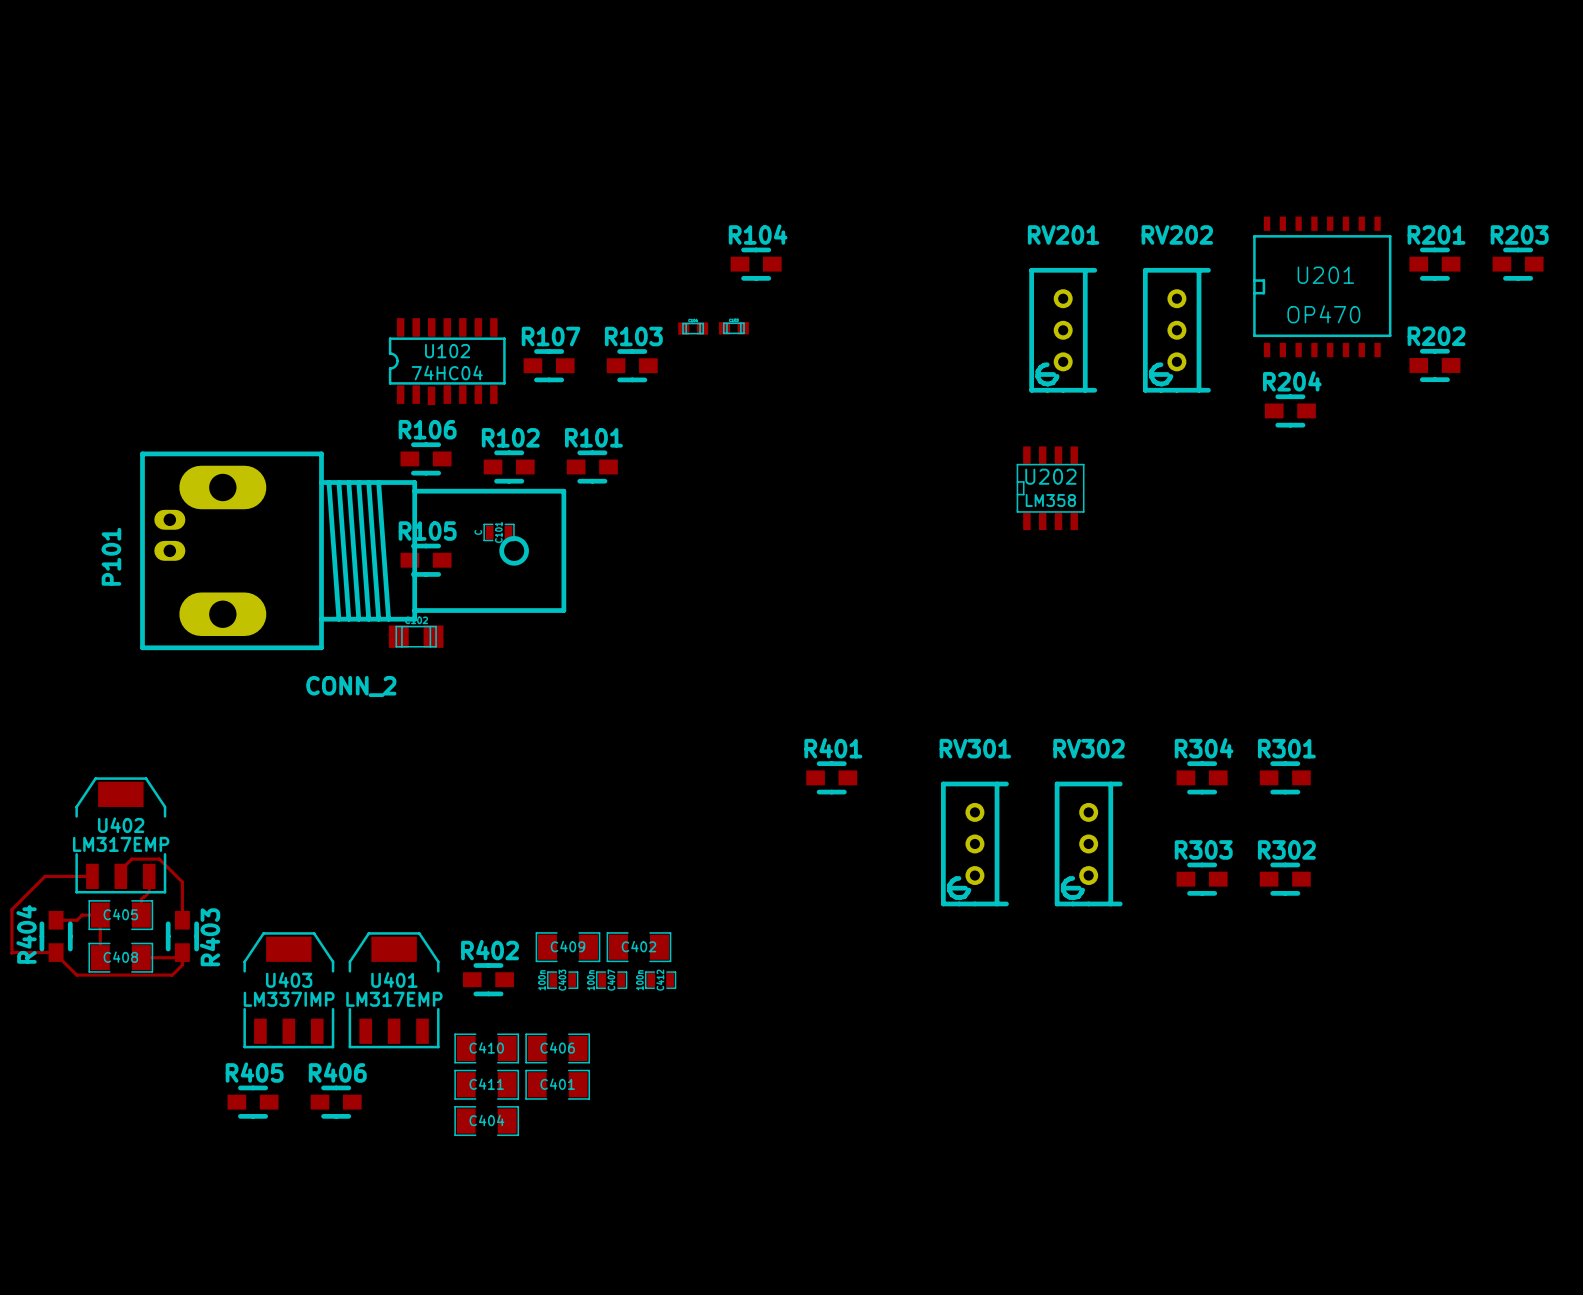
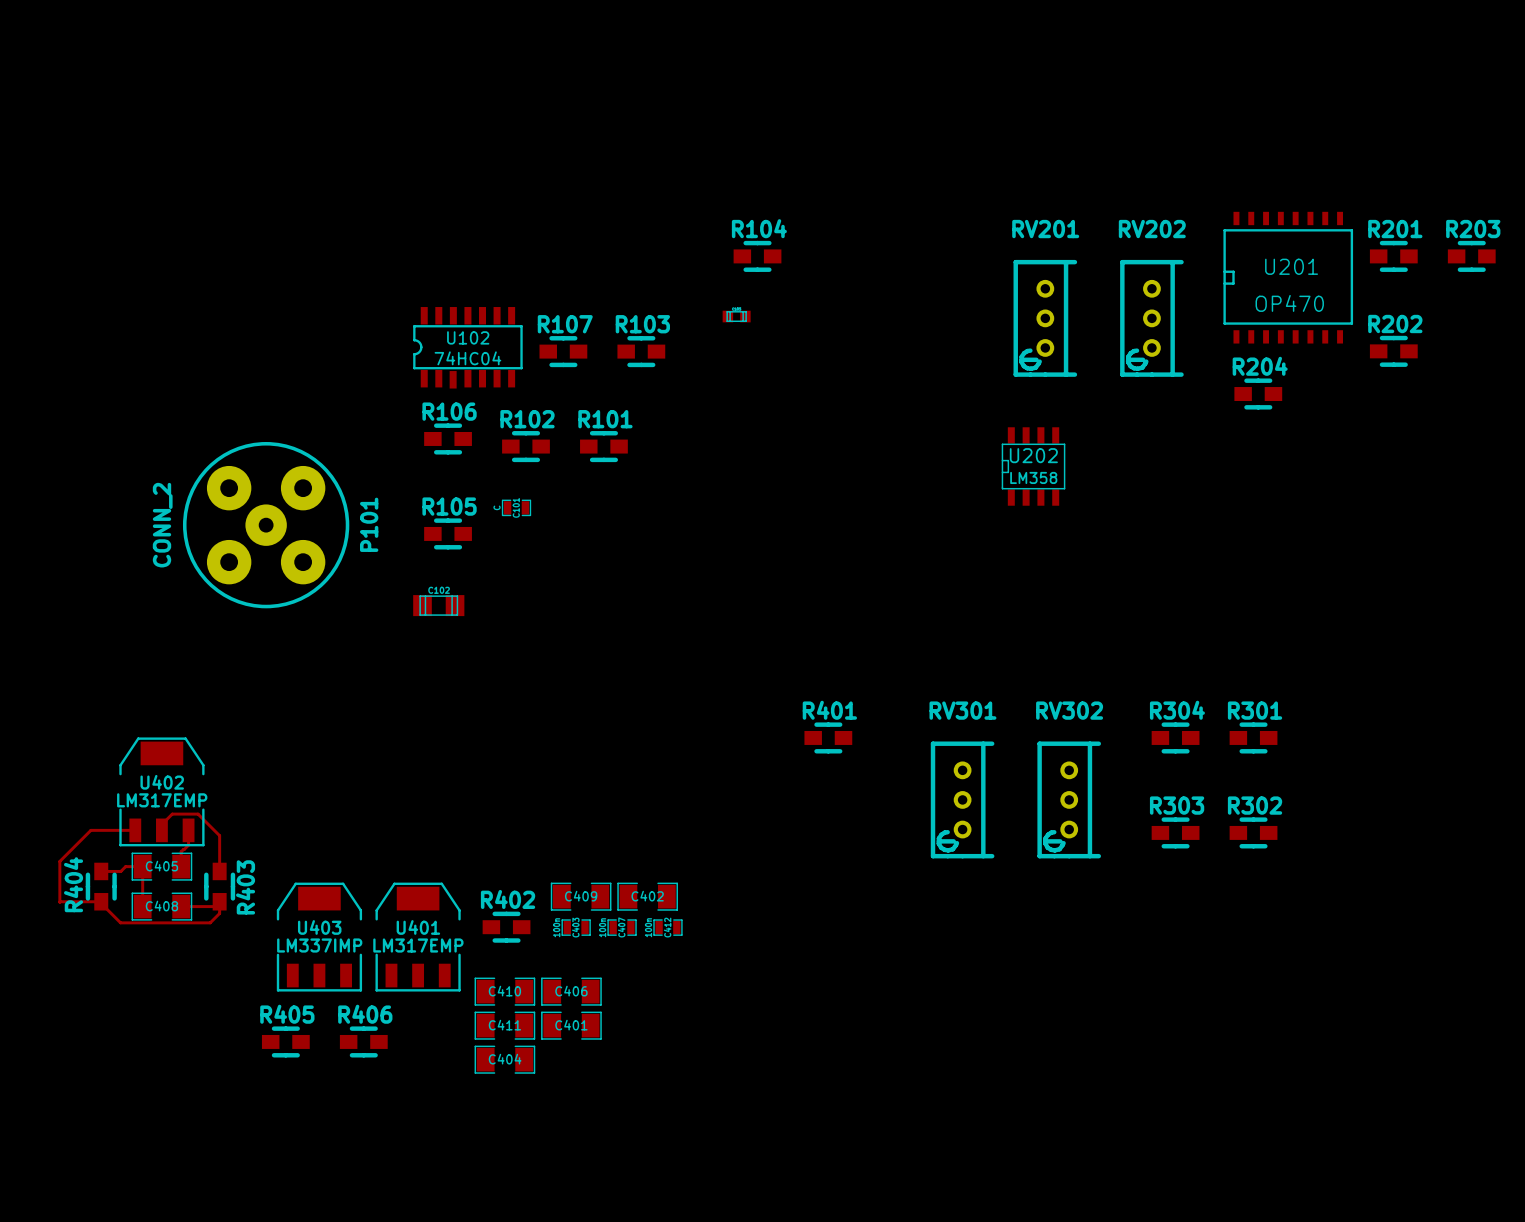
part: (693, 328) -> none
P101 footprint: [140, 451, 567, 651] -> [182, 441, 350, 609]
P101 name position: P101 (111, 556) -> P101 (369, 524)
P101 value position: CONN_2 (351, 686) -> CONN_2 (162, 525)

